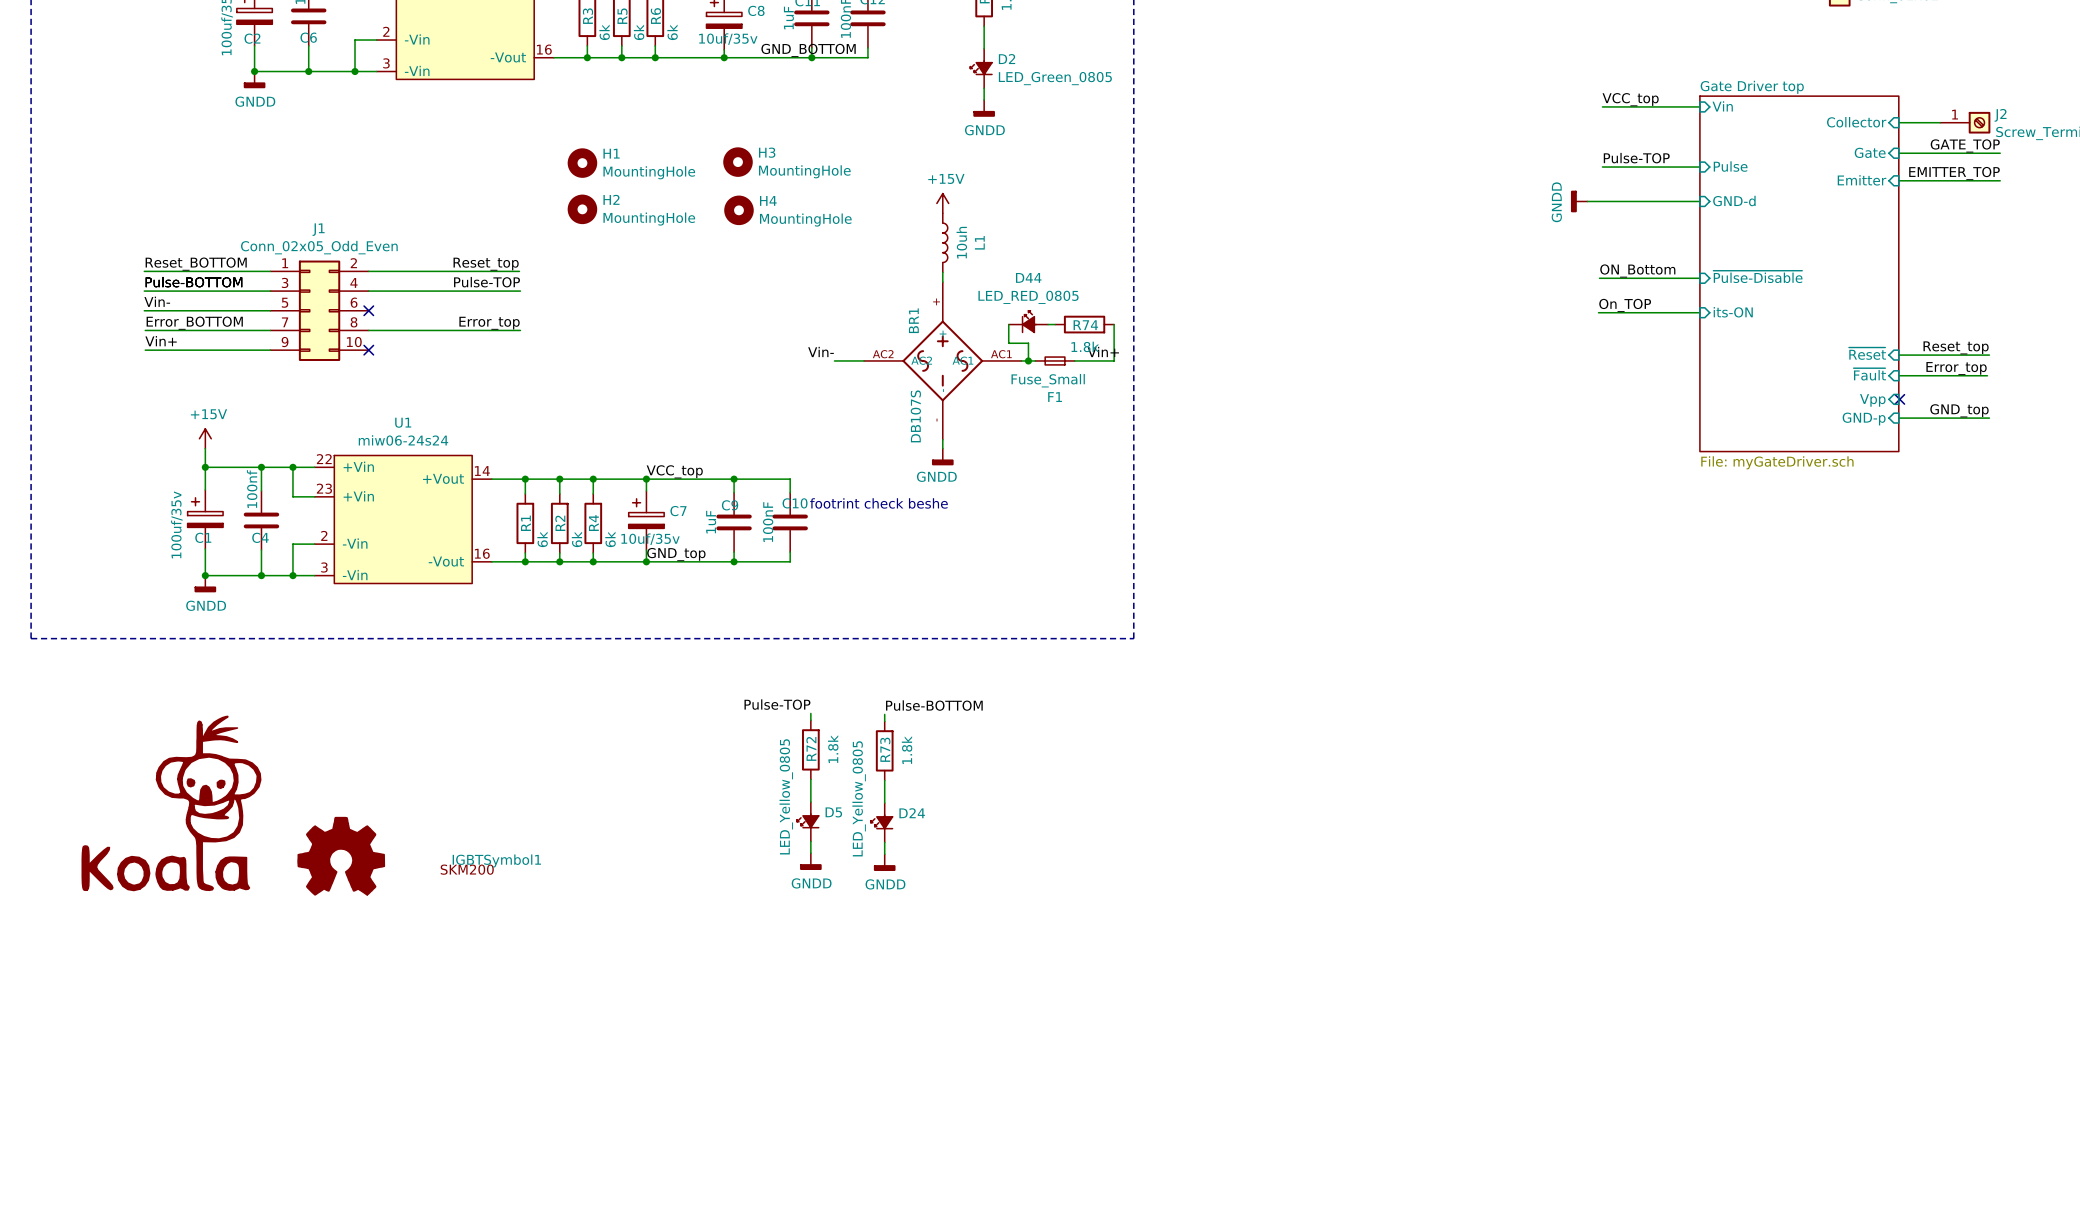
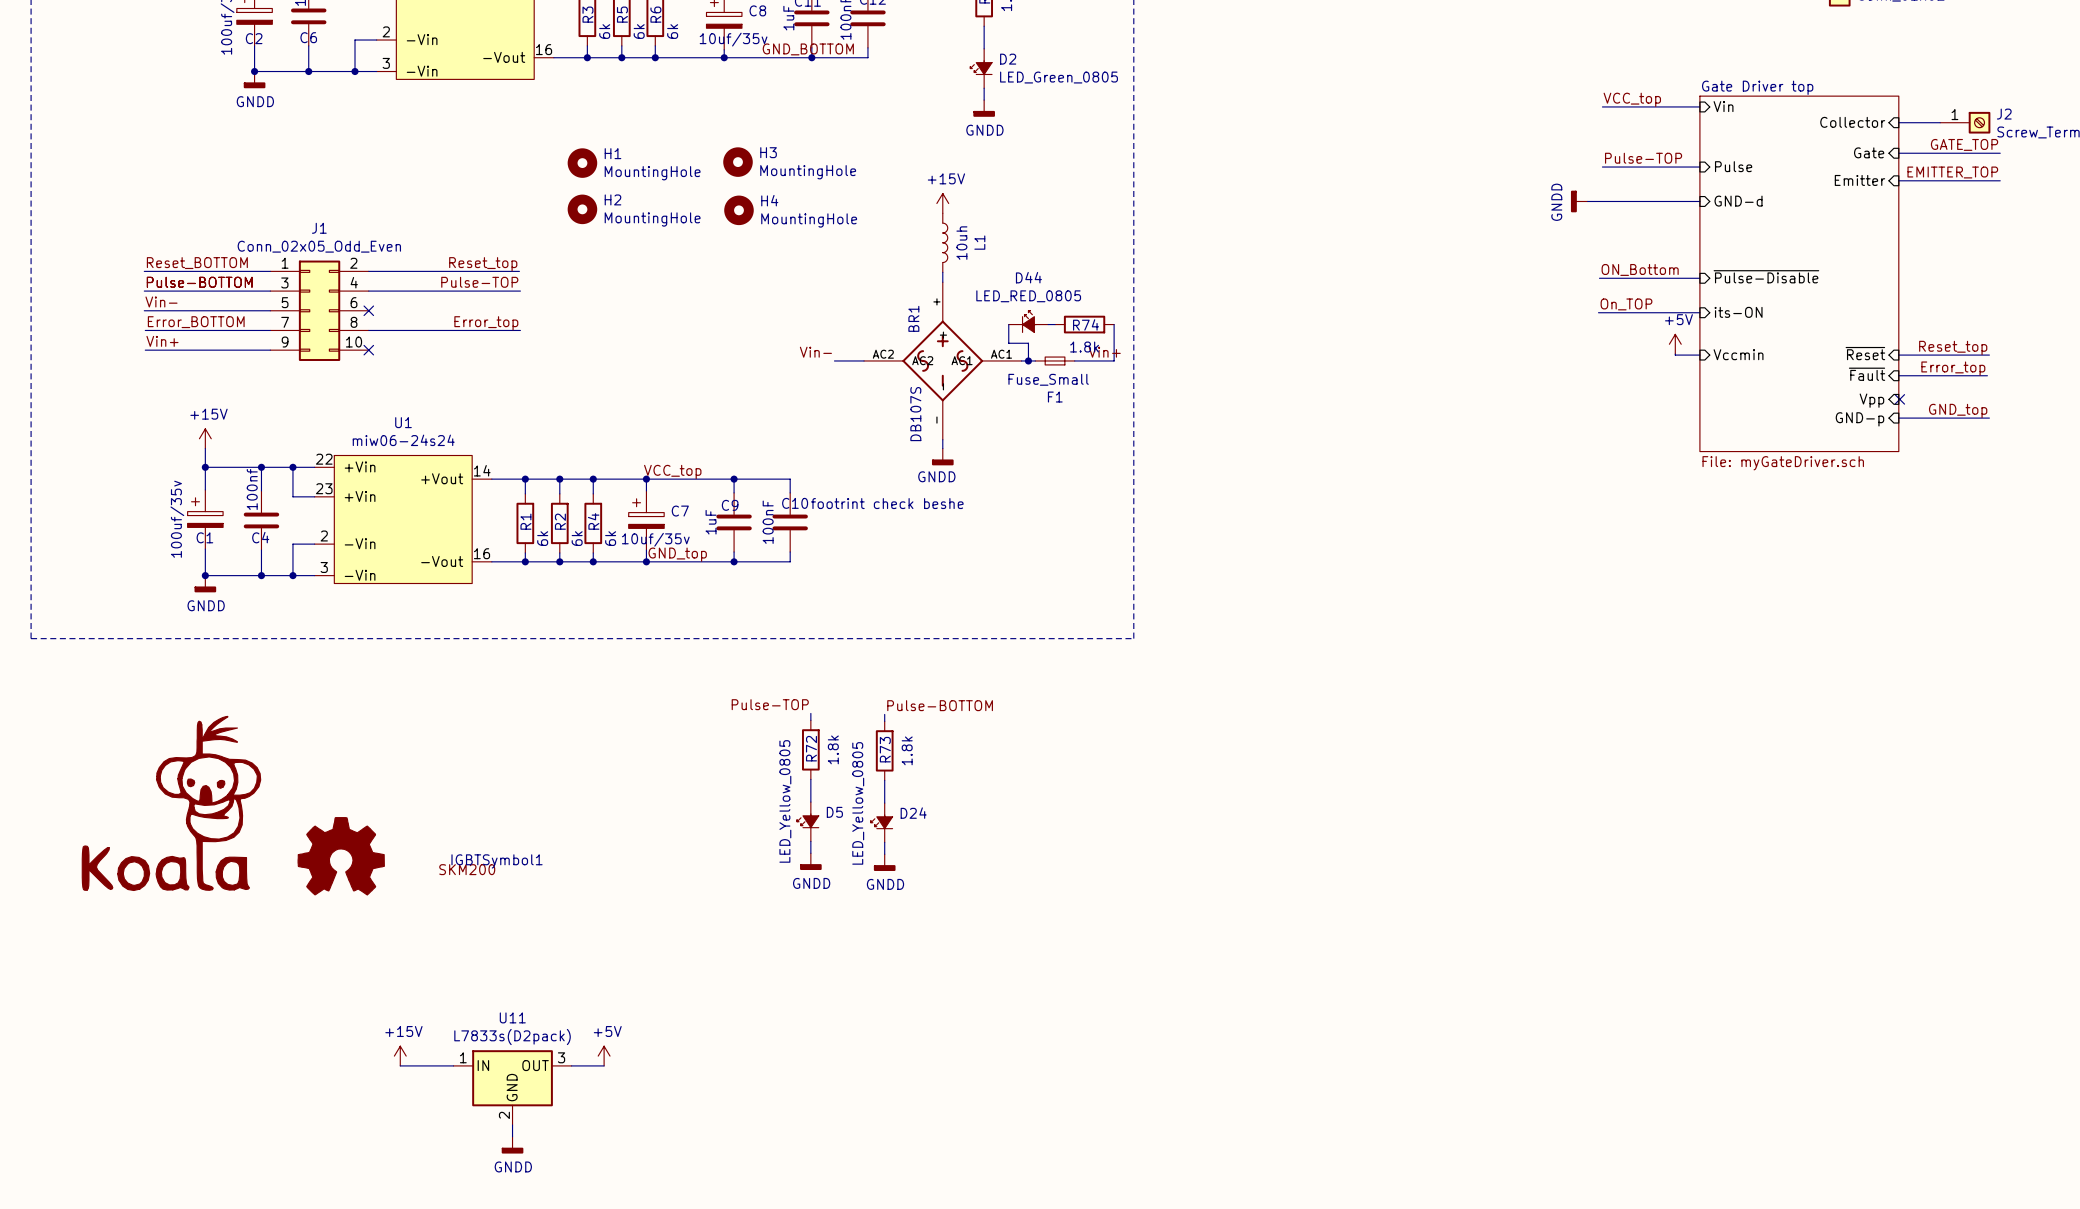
power symbol: none -> +5V (1675, 344)
wire: none -> (1675, 354) (1699, 355)
sheet pin: none -> Vccmin (1738, 354)
power symbol: none -> +15V (400, 1056)
power symbol: none -> +5V (604, 1056)
wire: none -> (400, 1065) (453, 1065)
wire: none -> (571, 1065) (604, 1065)
U11: none -> L7833s(D2pack) (512, 1087)
wire: none -> (512, 1125) (512, 1136)
power symbol: none -> GNDD (512, 1145)

